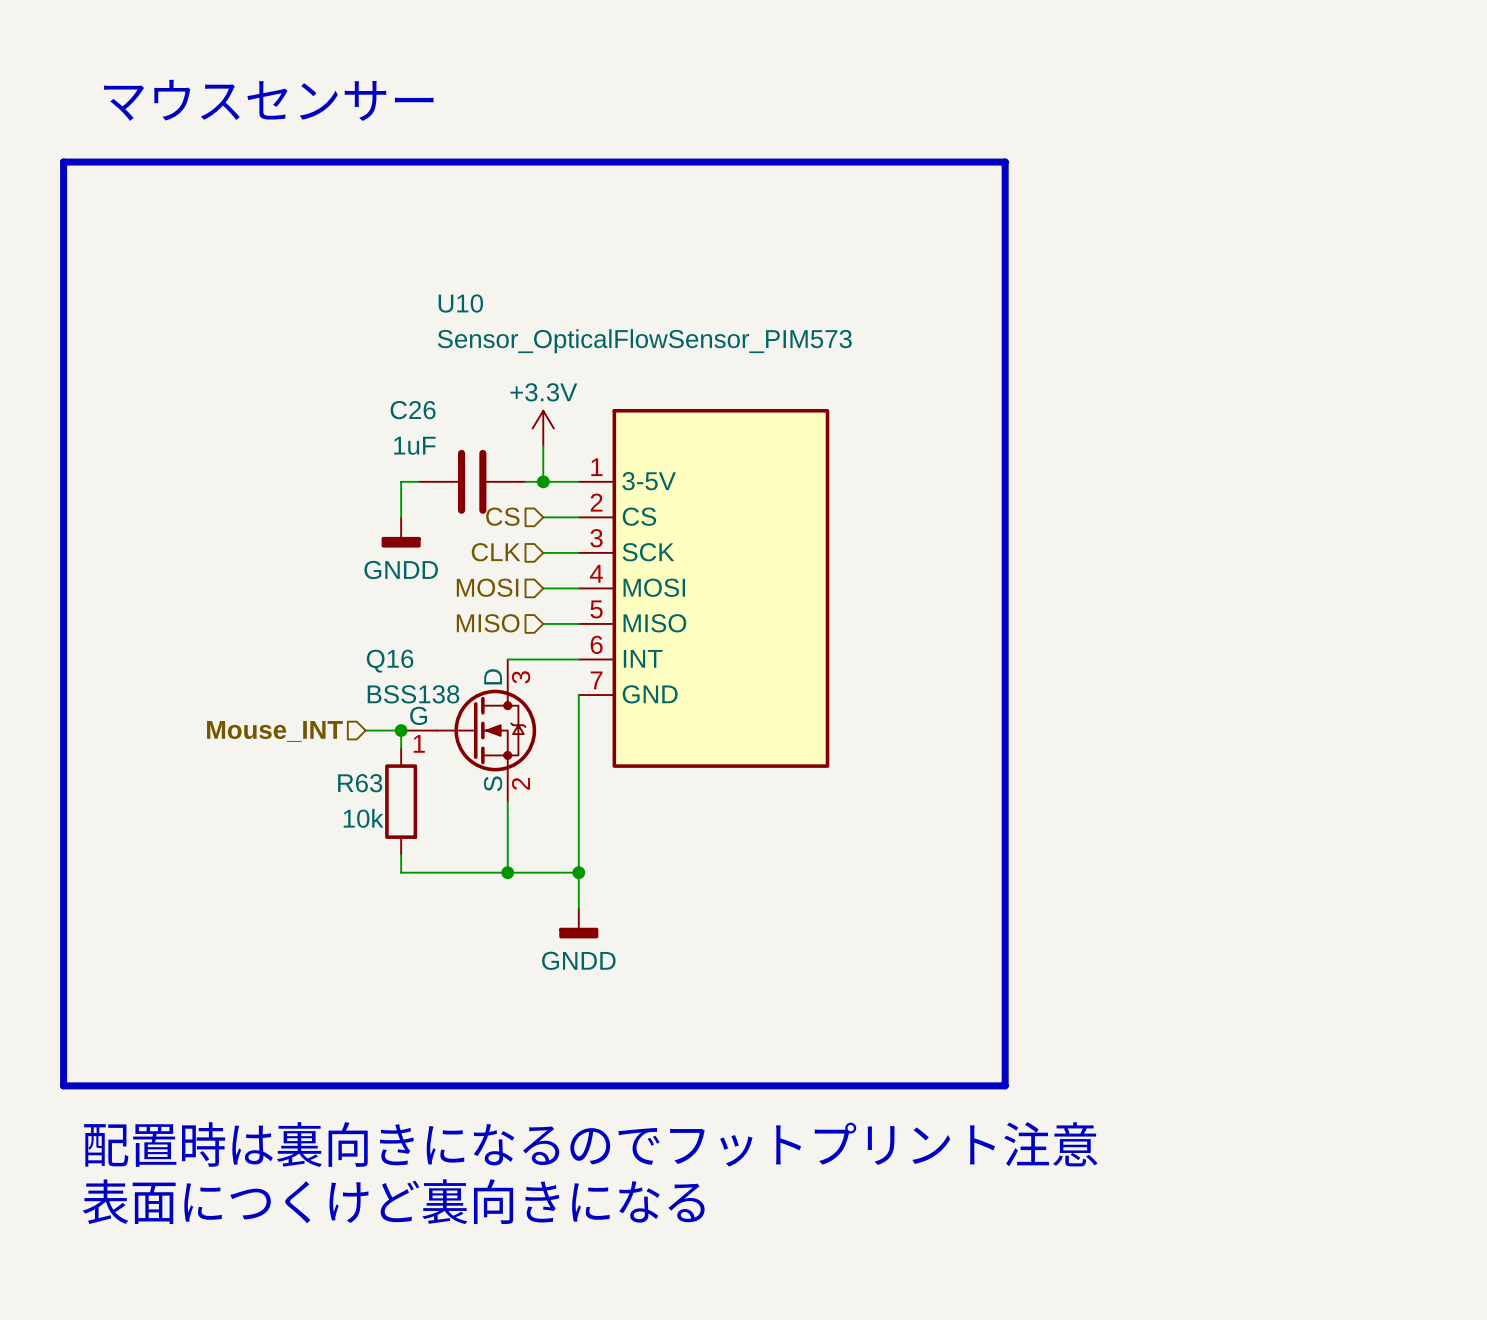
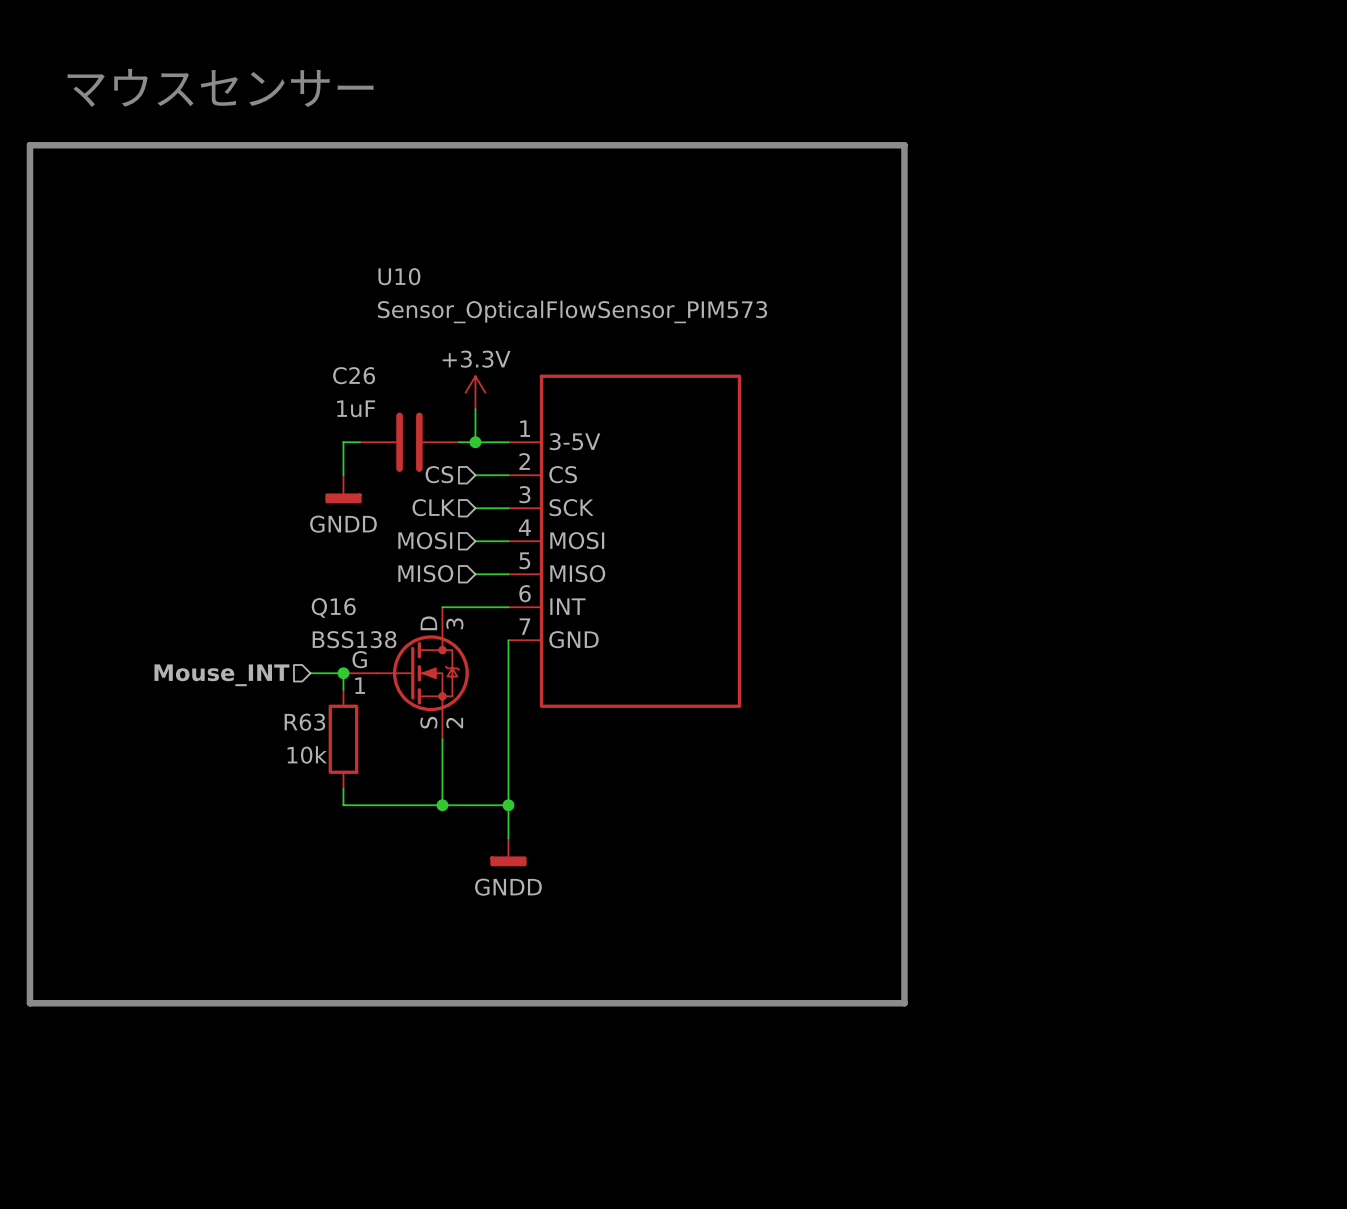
text: 配置時は裏向きになるのでフットプリント注意 (590, 1144) -> none
text: 表面につくけど裏向きになる (393, 1201) -> none

